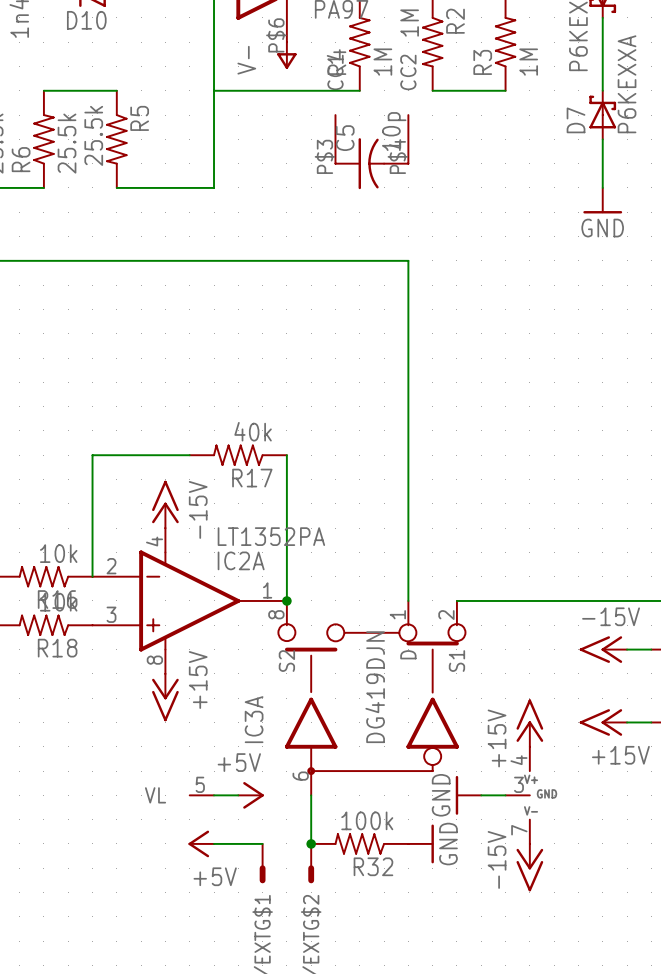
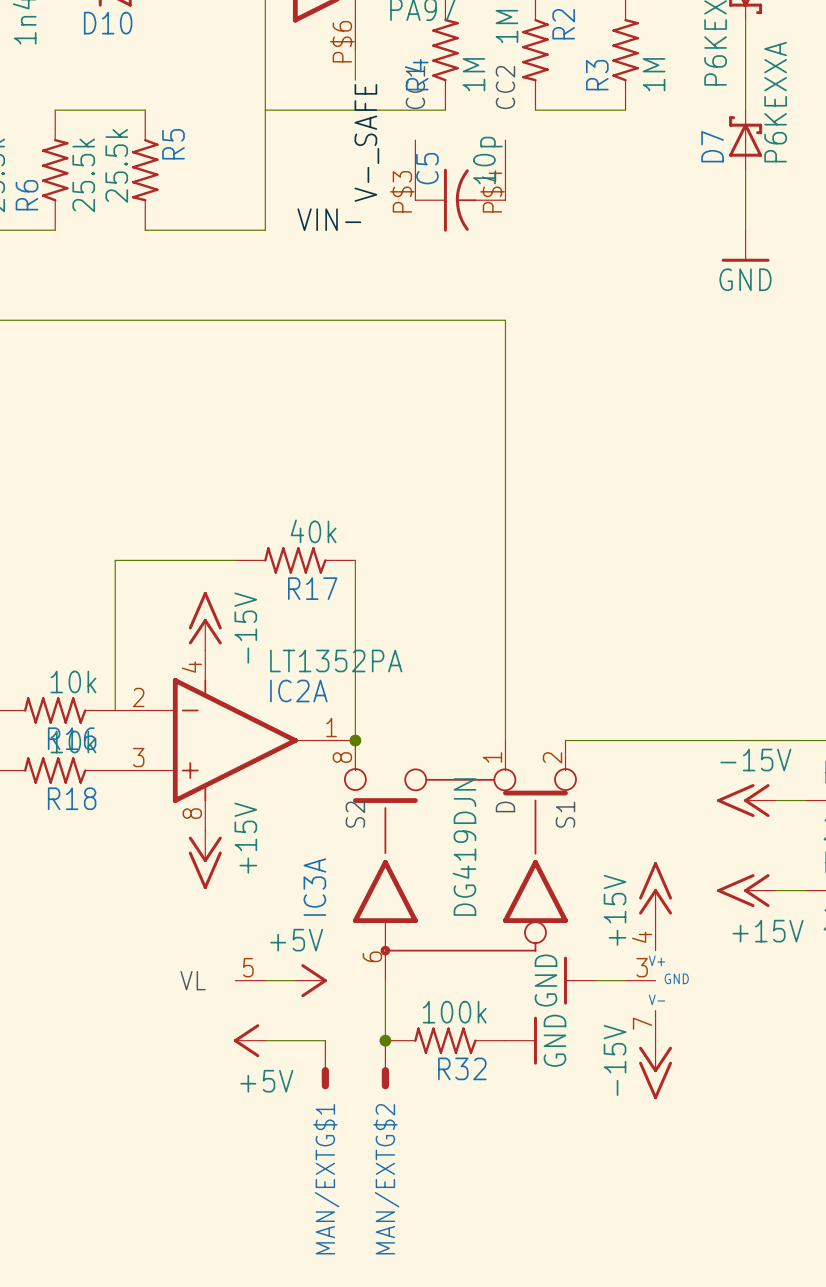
power symbol: V- (286, 55) -> none
label: none -> V-_SAFE (366, 142)
label: none -> VIN- (329, 219)

